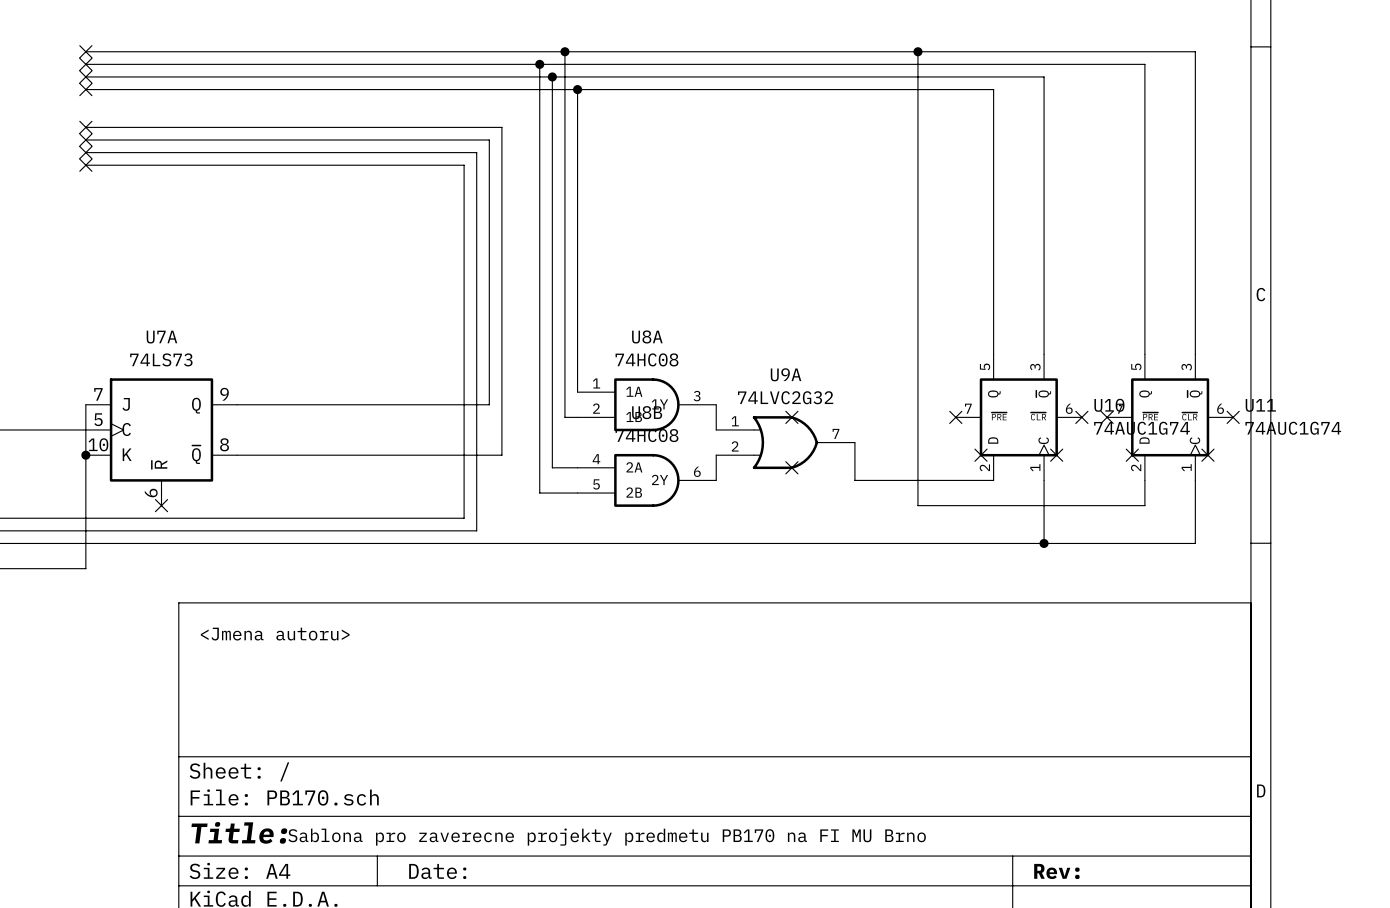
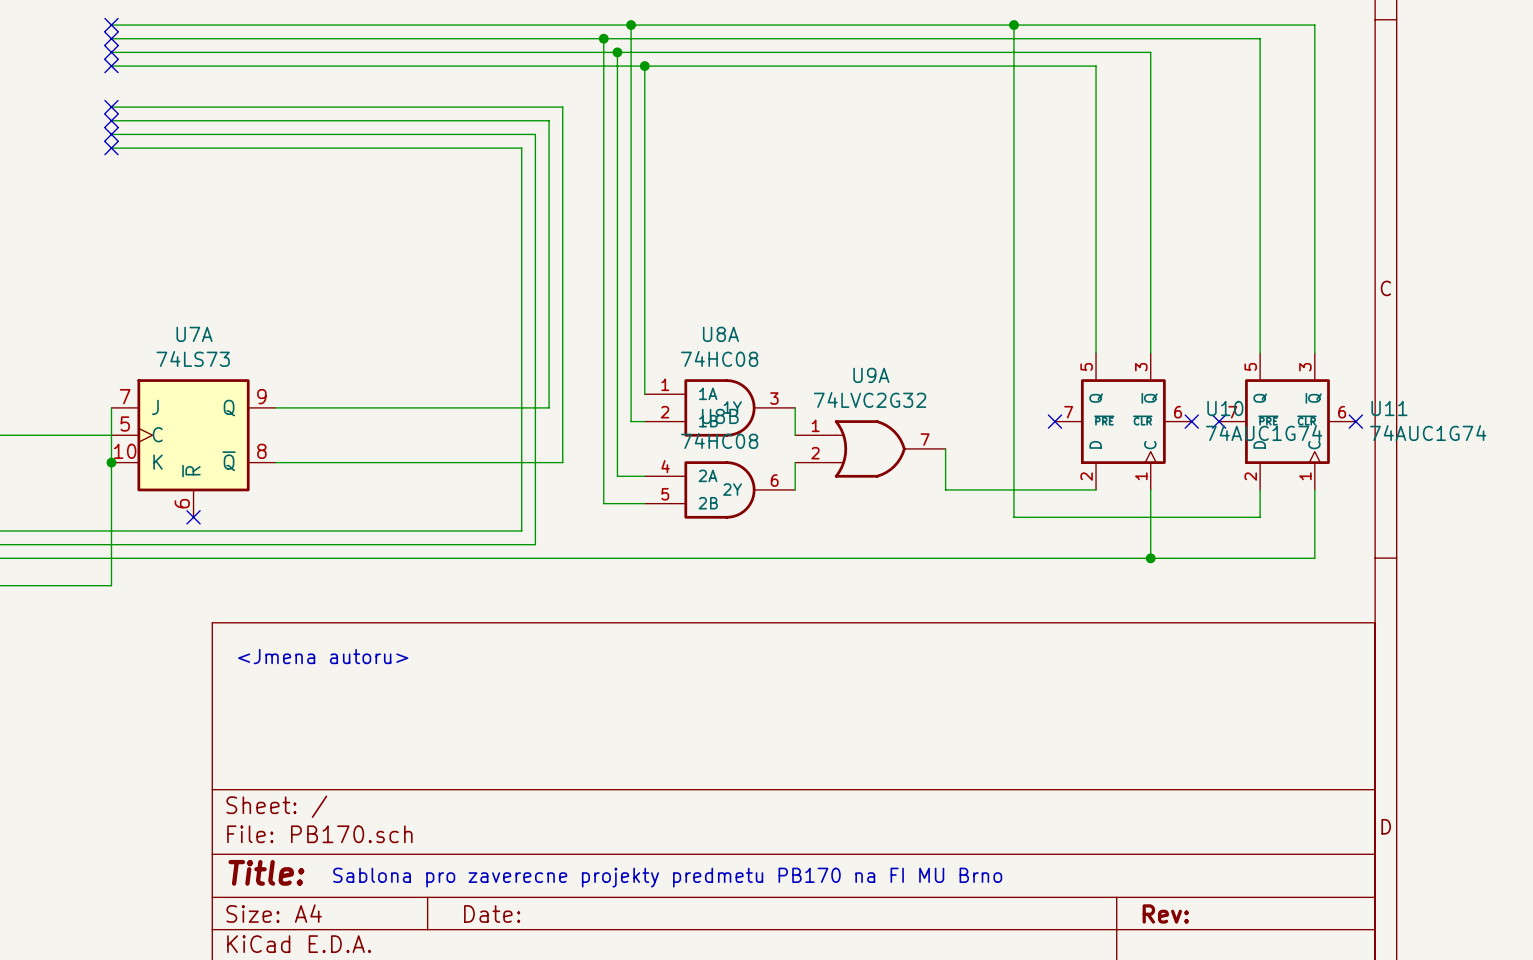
no-connect mark: (791, 417) -> none
no-connect mark: (981, 455) -> none
no-connect mark: (1056, 455) -> none
no-connect mark: (1132, 455) -> none
no-connect mark: (1207, 455) -> none
no-connect mark: (791, 467) -> none

